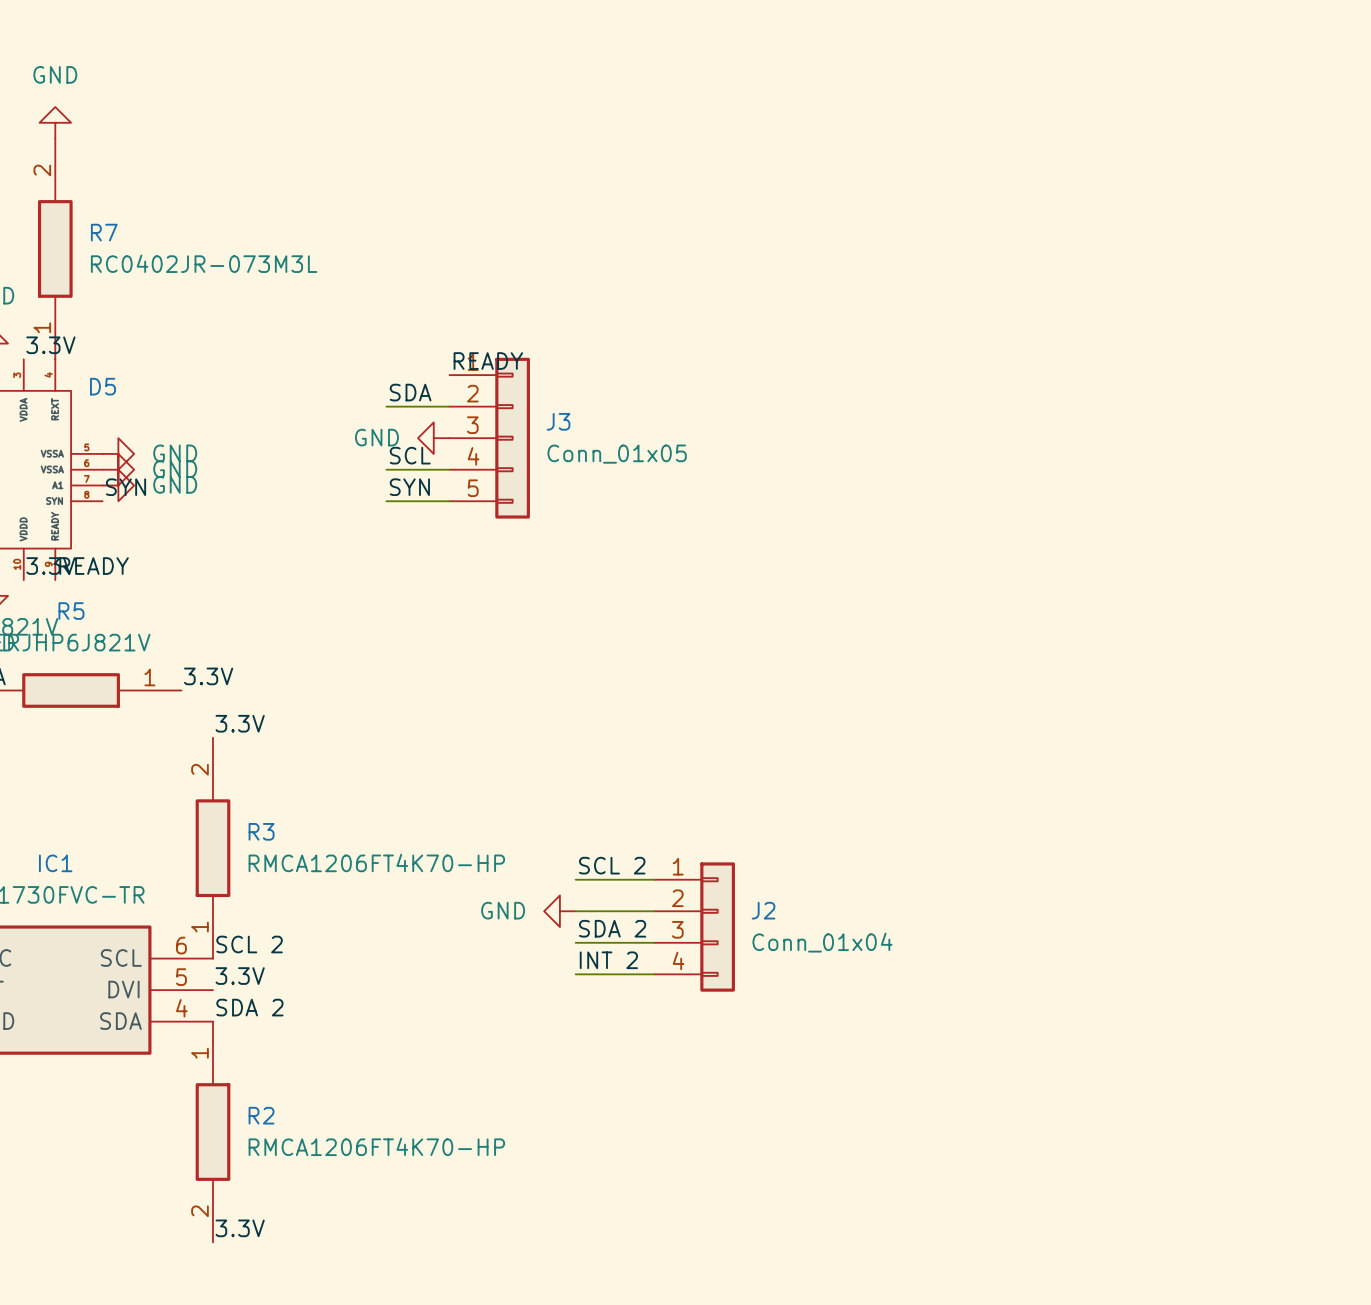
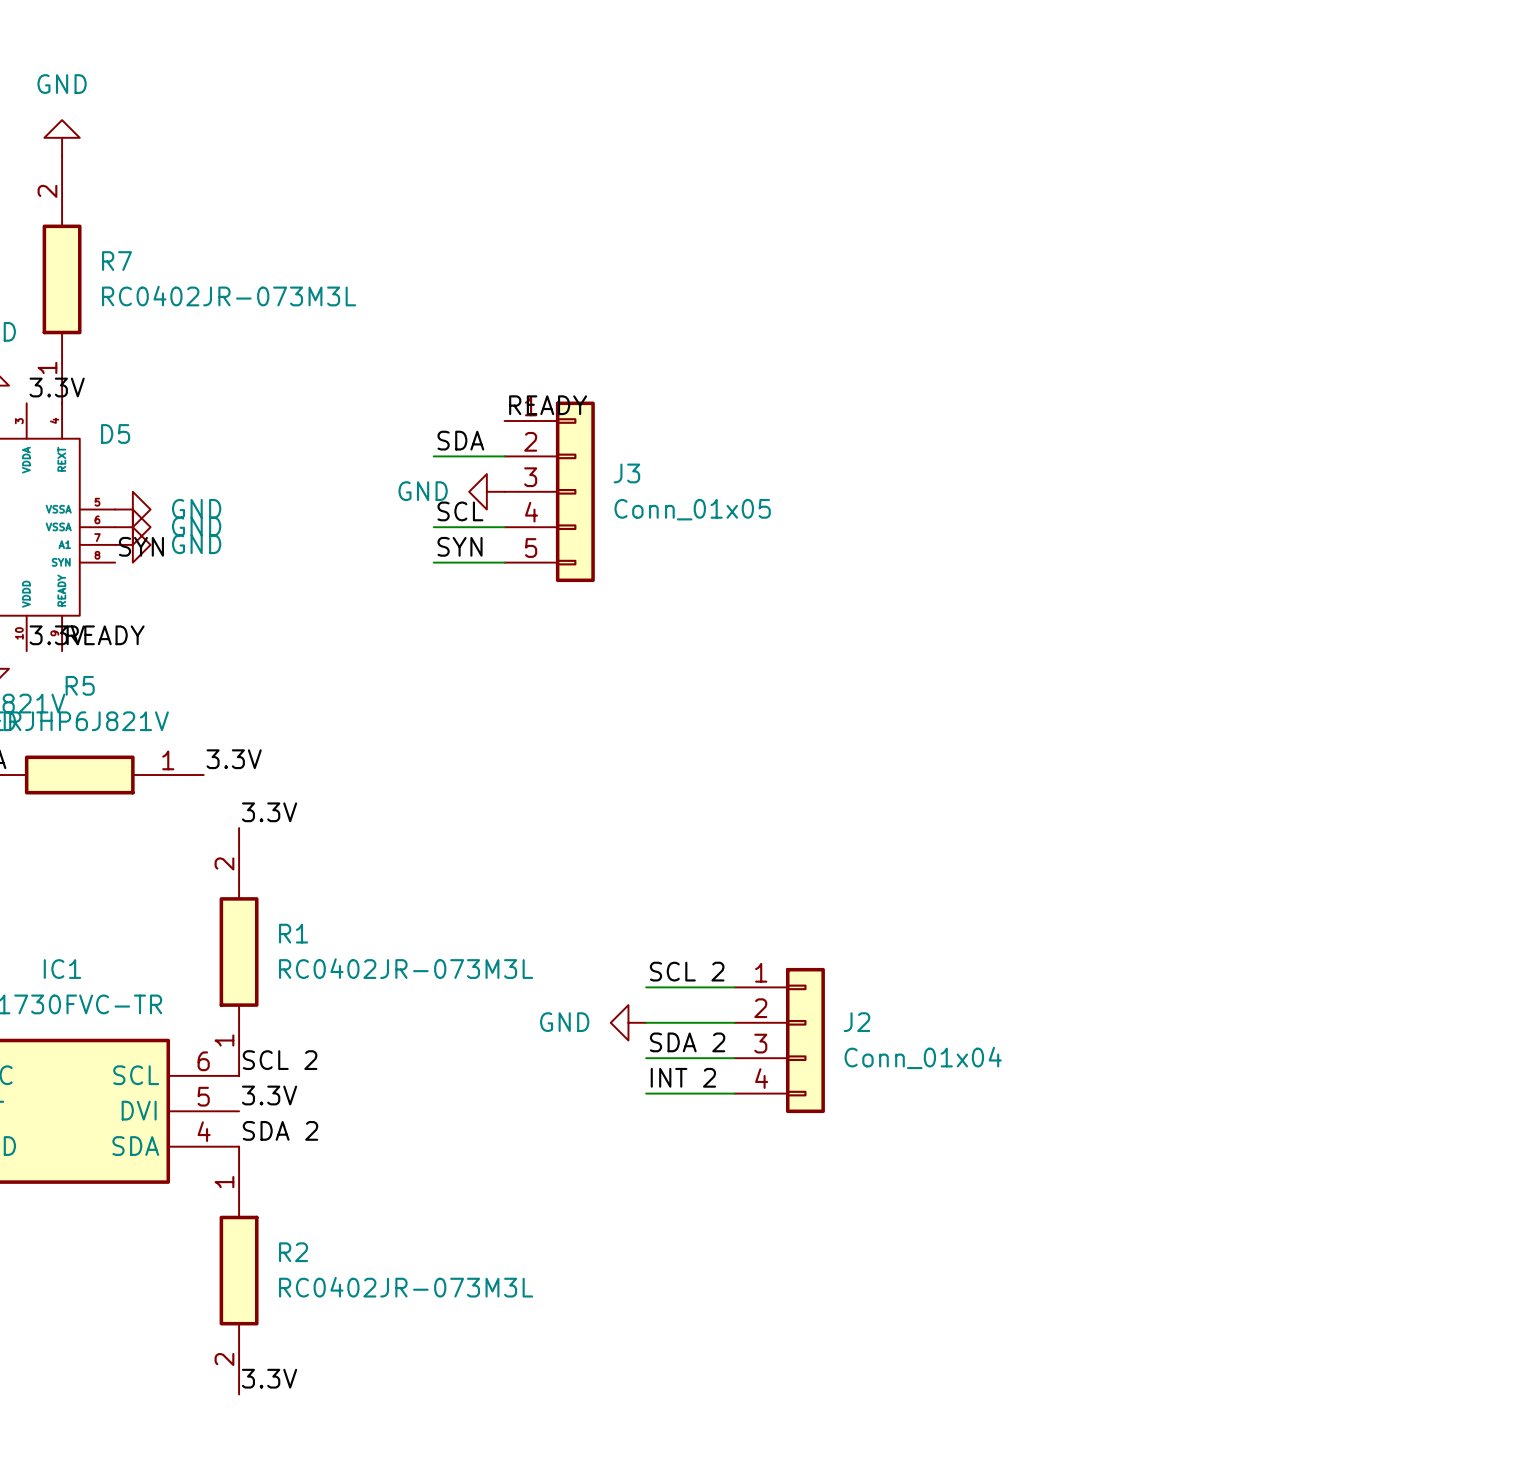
R3 name: R3 (261, 831) -> R1 (293, 933)
R3 value: RMCA1206FT4K70-HP (376, 862) -> RC0402JR-073M3L (406, 968)
R2 value: RMCA1206FT4K70-HP (376, 1146) -> RC0402JR-073M3L (406, 1287)

